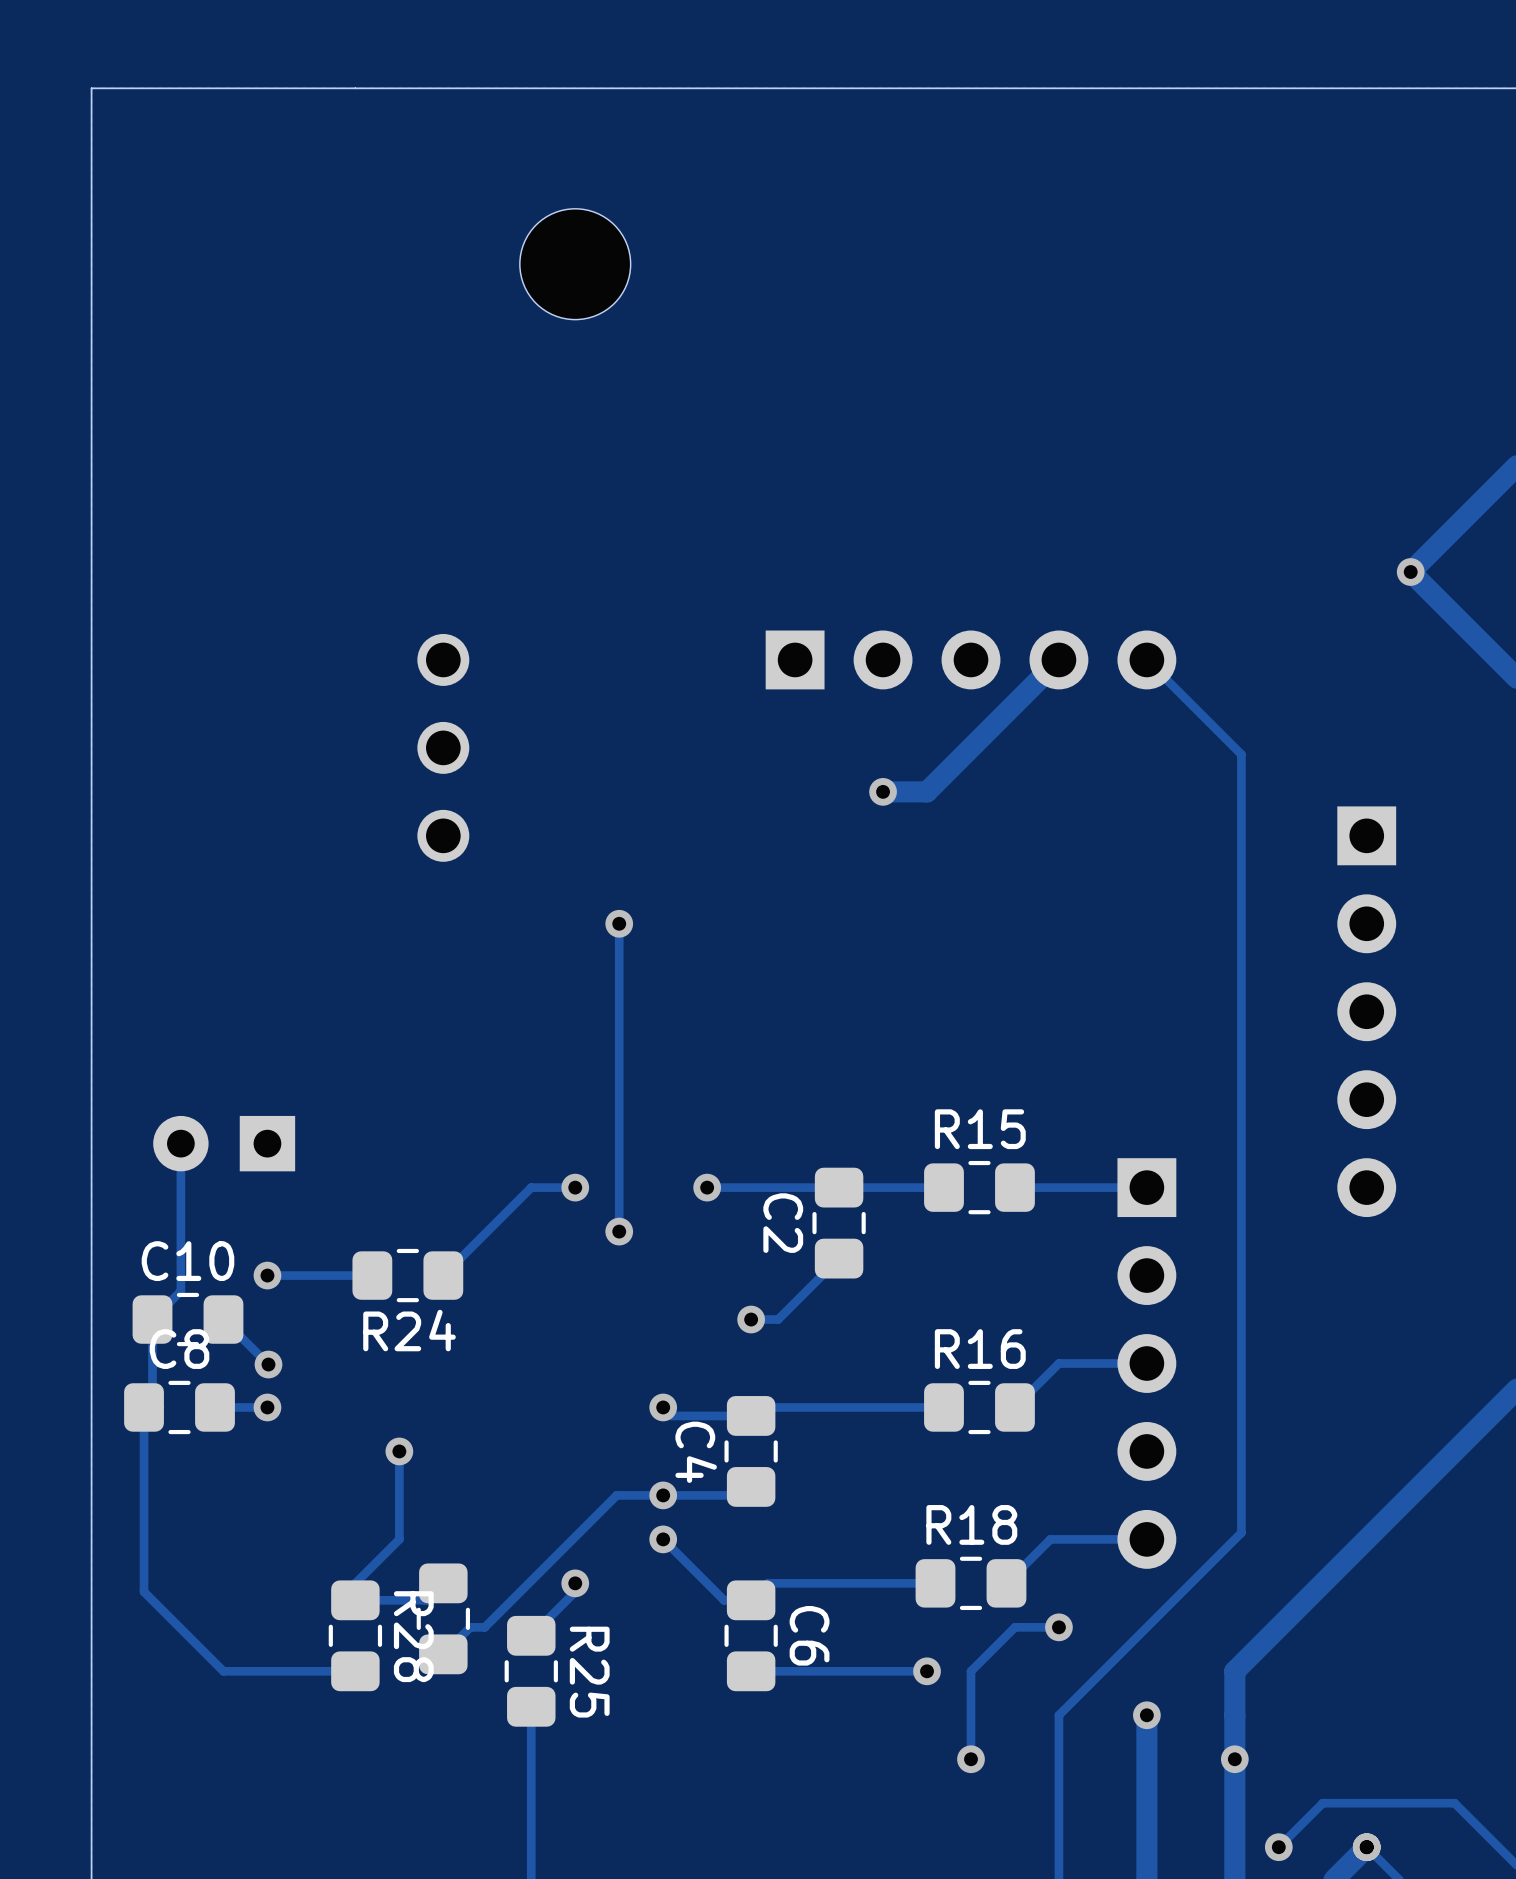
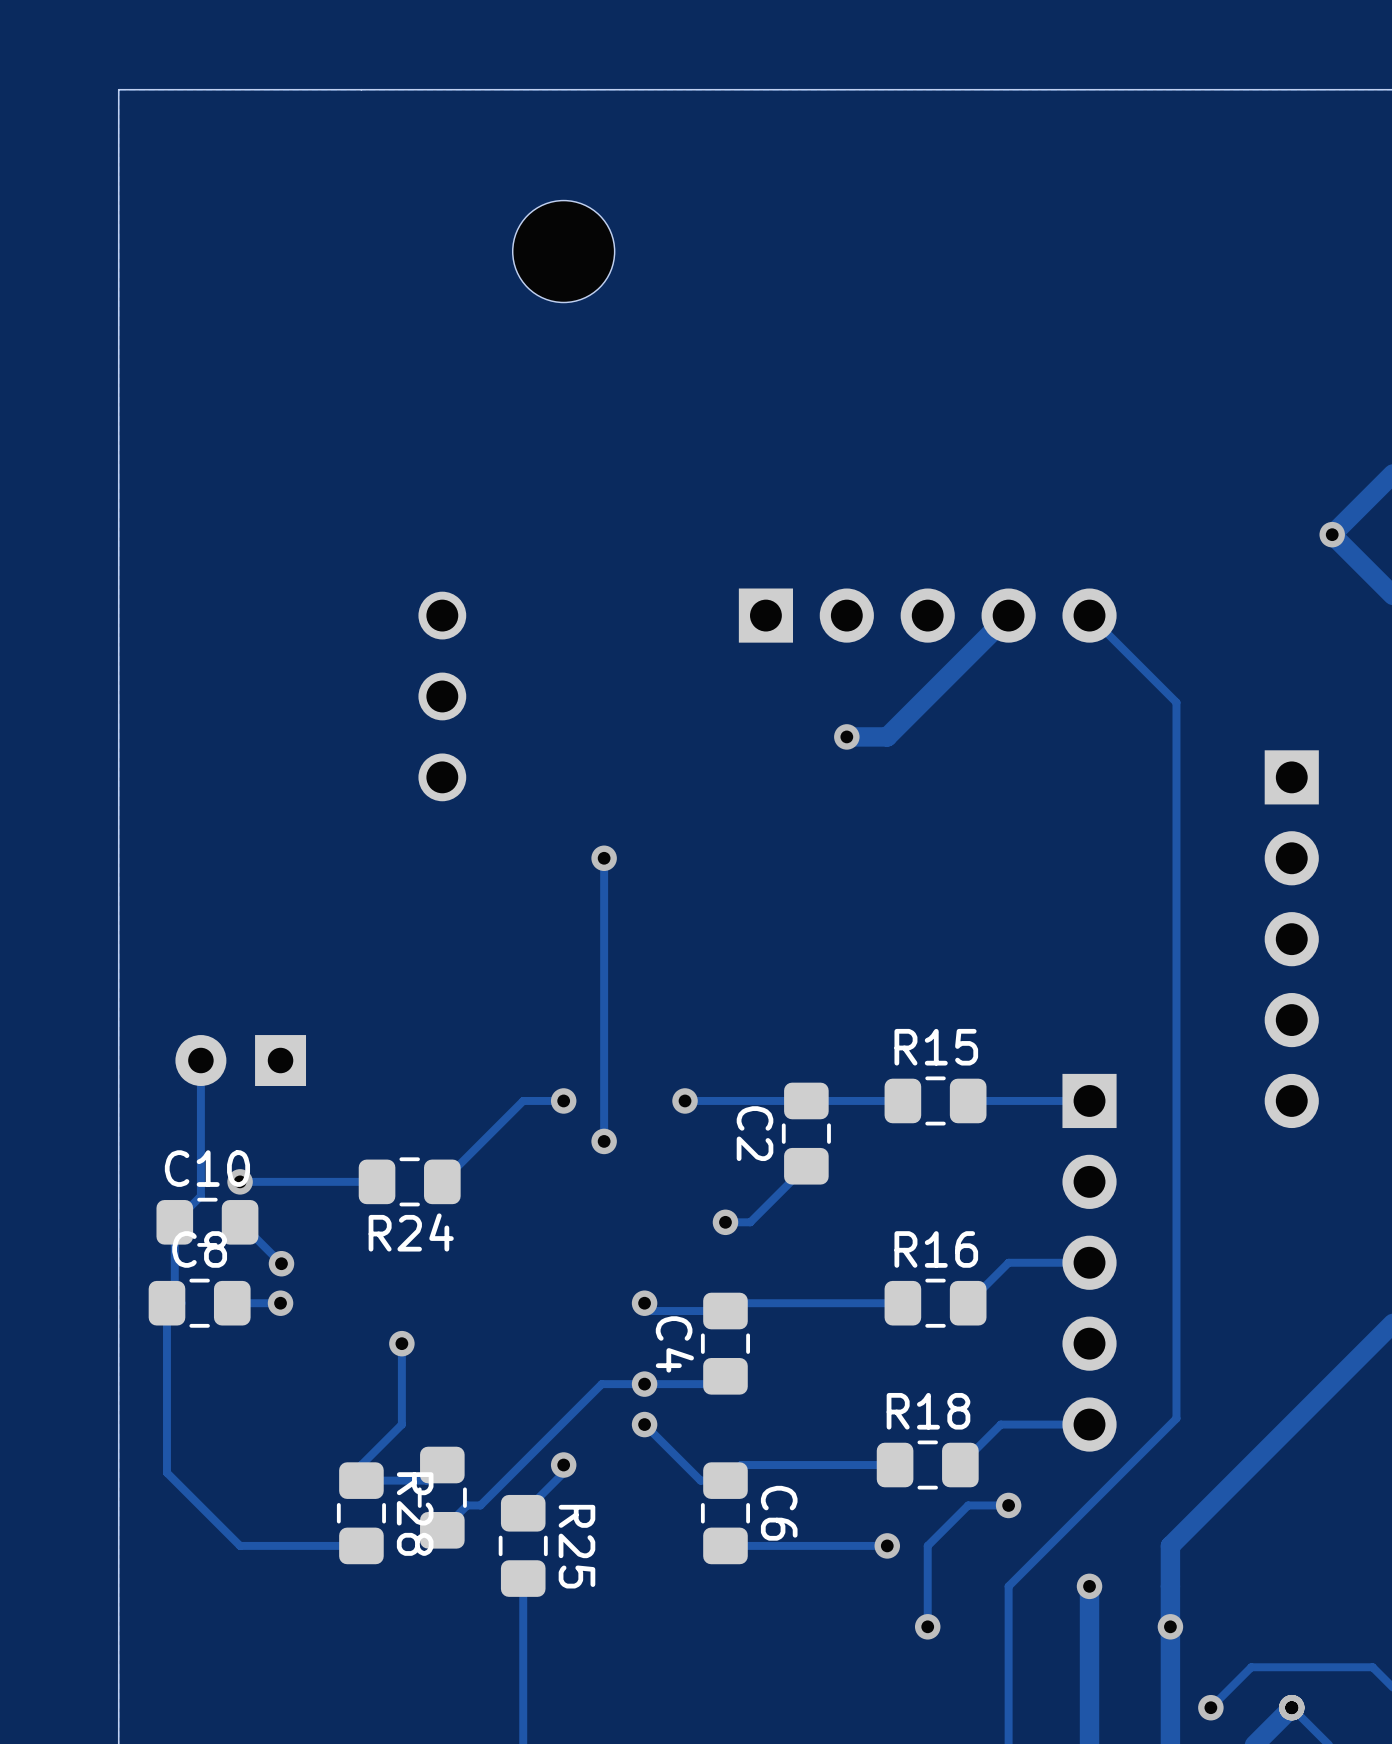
track: none -> (280, 1181) (240, 1181)
via position: (267, 1275) -> (240, 1181)

